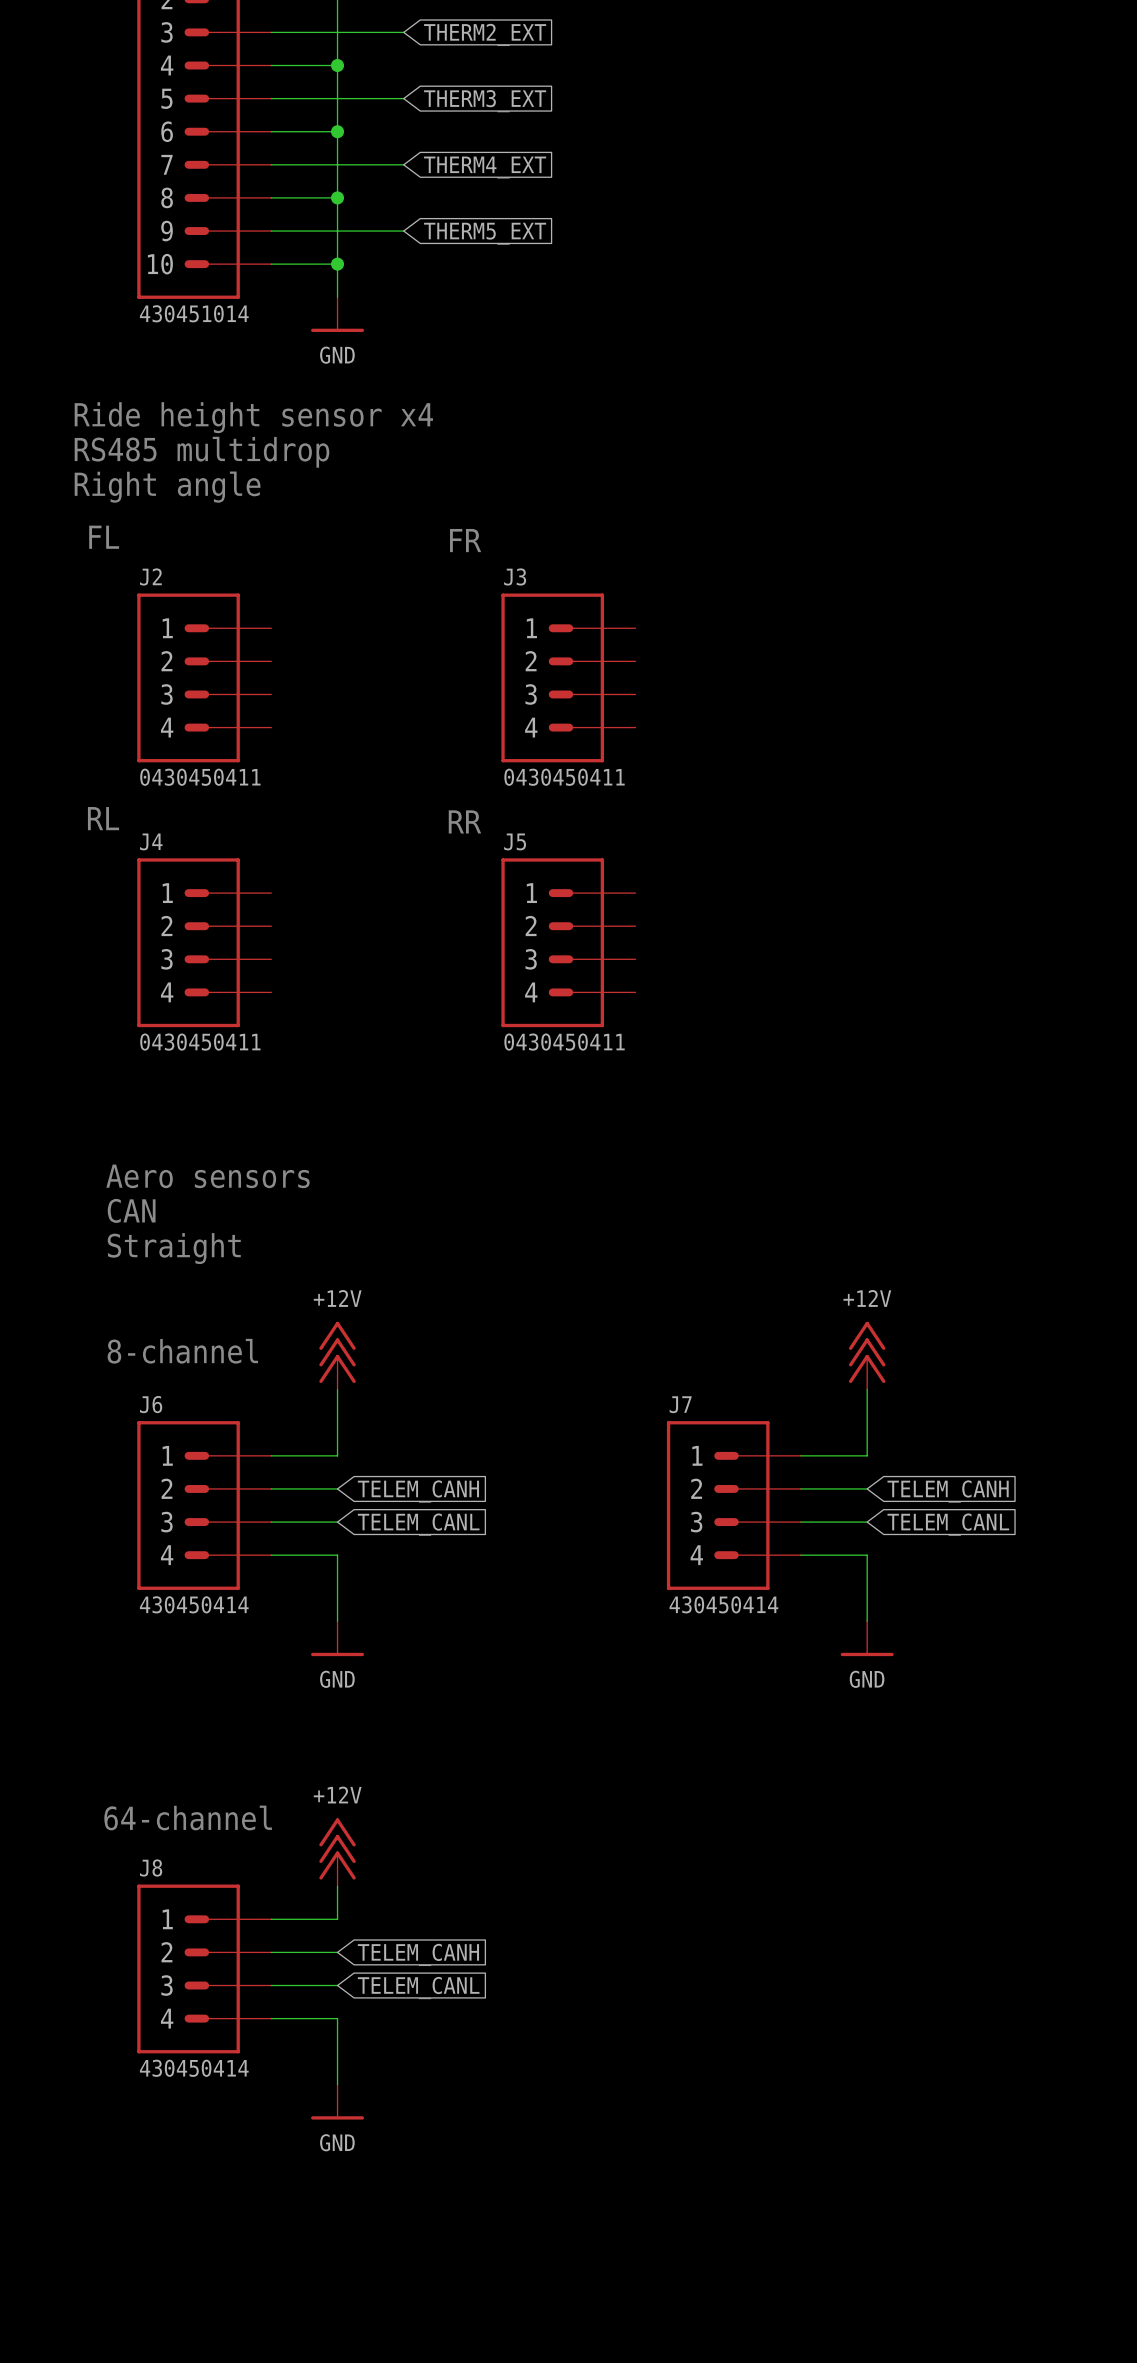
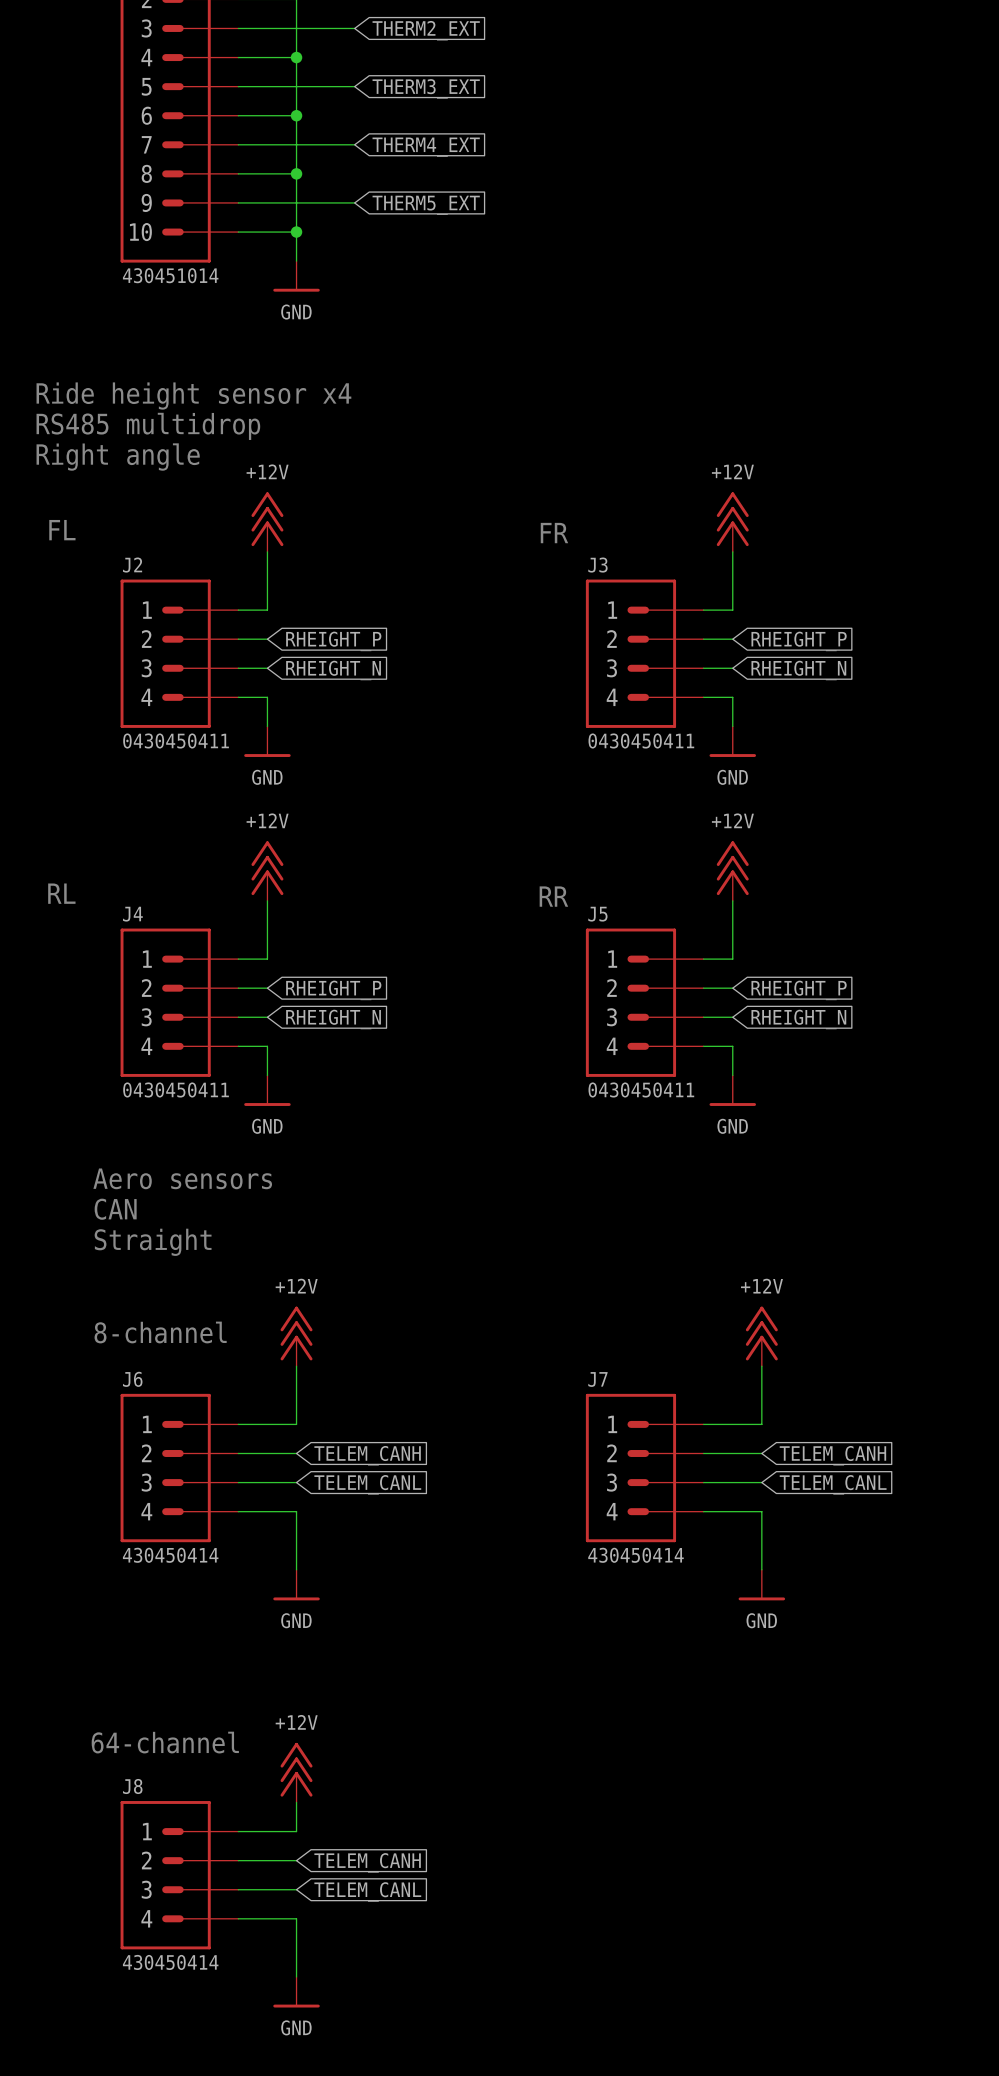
text position: Ride height sensor x4 (253, 417) -> Ride height sensor x4 (193, 396)
text position: RS485 multidrop (201, 452) -> RS485 multidrop (148, 426)
text position: Right angle (167, 487) -> Right angle (118, 457)
text position: FL (104, 537) -> FL (62, 530)
text position: FR (465, 540) -> FR (554, 533)
power symbol: none -> +12V (267, 522)
power symbol: none -> +12V (732, 522)
wire: none -> (267, 551) (267, 610) (238, 610)
wire: none -> (732, 551) (732, 610) (703, 610)
J2 position: (204, 677) -> (179, 653)
J3 position: (568, 677) -> (644, 653)
wire: none -> (238, 639) (267, 639)
wire: none -> (703, 639) (732, 639)
global label: none -> RHEIGHT_P (333, 641)
global label: none -> RHEIGHT_P (799, 641)
wire: none -> (238, 668) (267, 668)
wire: none -> (703, 668) (732, 668)
global label: none -> RHEIGHT_N (333, 670)
global label: none -> RHEIGHT_N (798, 670)
wire: none -> (238, 697) (267, 697) (267, 726)
wire: none -> (703, 697) (732, 697) (732, 726)
text position: RL (103, 818) -> RL (61, 893)
text position: RR (464, 821) -> RR (553, 896)
power symbol: none -> GND (267, 741)
power symbol: none -> GND (732, 741)
J4 position: (204, 942) -> (179, 1002)
J5 position: (568, 942) -> (644, 1002)
power symbol: none -> +12V (267, 871)
power symbol: none -> +12V (732, 871)
wire: none -> (267, 900) (267, 959) (238, 959)
wire: none -> (732, 900) (732, 959) (703, 959)
wire: none -> (238, 988) (267, 988)
wire: none -> (703, 988) (732, 988)
global label: none -> RHEIGHT_P (333, 990)
global label: none -> RHEIGHT_P (799, 990)
wire: none -> (238, 1017) (267, 1017)
wire: none -> (703, 1017) (732, 1017)
global label: none -> RHEIGHT_N (333, 1019)
global label: none -> RHEIGHT_N (798, 1019)
text position: Aero sensors (207, 1176) -> Aero sensors (182, 1178)
wire: none -> (238, 1046) (267, 1046) (267, 1075)
wire: none -> (703, 1046) (732, 1046) (732, 1075)
text position: CAN (131, 1210) -> CAN (115, 1209)
power symbol: none -> GND (267, 1090)
power symbol: none -> GND (732, 1090)
text position: Straight (174, 1248) -> Straight (153, 1242)
text position: 8-channel (182, 1351) -> 8-channel (160, 1332)
power symbol: +12V (337, 1355) -> none
power symbol position: +12V (867, 1355) -> +12V (761, 1336)
wire: (337, 1389) (337, 1455) (271, 1455) -> none
wire: (867, 1389) (867, 1455) (800, 1455) -> none
wire: (271, 1488) (337, 1488) -> (238, 1424) (296, 1424)
wire: (800, 1488) (867, 1488) -> (703, 1424) (761, 1424)
global label: TELEM_CANH (418, 1491) -> none
global label position: TELEM_CANH (948, 1491) -> TELEM_CANH (832, 1455)
J6 position: (204, 1505) -> (179, 1468)
J7 position: (733, 1505) -> (644, 1468)
power symbol: none -> +12V (296, 1336)
wire: (271, 1522) (337, 1522) -> (238, 1453) (296, 1453)
wire: (800, 1522) (867, 1522) -> (703, 1453) (761, 1453)
global label: TELEM_CANL (418, 1524) -> none
global label position: TELEM_CANL (948, 1524) -> TELEM_CANL (833, 1484)
wire: (271, 1555) (337, 1555) -> (238, 1482) (296, 1482)
wire: (800, 1555) (867, 1555) -> (703, 1482) (761, 1482)
power symbol: GND (337, 1638) -> none
power symbol position: GND (867, 1638) -> GND (761, 1585)
global label: none -> TELEM_CANH (367, 1455)
global label: none -> TELEM_CANL (367, 1484)
wire: none -> (238, 1511) (296, 1511) (296, 1569)
wire: none -> (703, 1511) (761, 1511) (761, 1569)
power symbol: none -> GND (296, 1585)
text position: 64-channel (188, 1817) -> 64-channel (165, 1742)
power symbol: +12V (337, 1852) -> none
wire: (337, 1886) (337, 1919) (271, 1919) -> none
wire: (271, 1952) (337, 1952) -> (238, 1831) (296, 1831)
global label: TELEM_CANH (418, 1954) -> none
J8 position: (204, 1968) -> (179, 1875)
wire: (271, 1985) (337, 1985) -> (238, 1860) (296, 1860)
global label: TELEM_CANL (418, 1988) -> none
power symbol: none -> +12V (296, 1772)
wire: (271, 2018) (337, 2018) (337, 2051) -> none
power symbol: GND (337, 2102) -> none
global label: none -> TELEM_CANH (367, 1862)
wire: none -> (238, 1889) (296, 1889)
global label: none -> TELEM_CANL (367, 1891)
wire: none -> (238, 1918) (296, 1918) (296, 1976)
power symbol: none -> GND (296, 1992)

